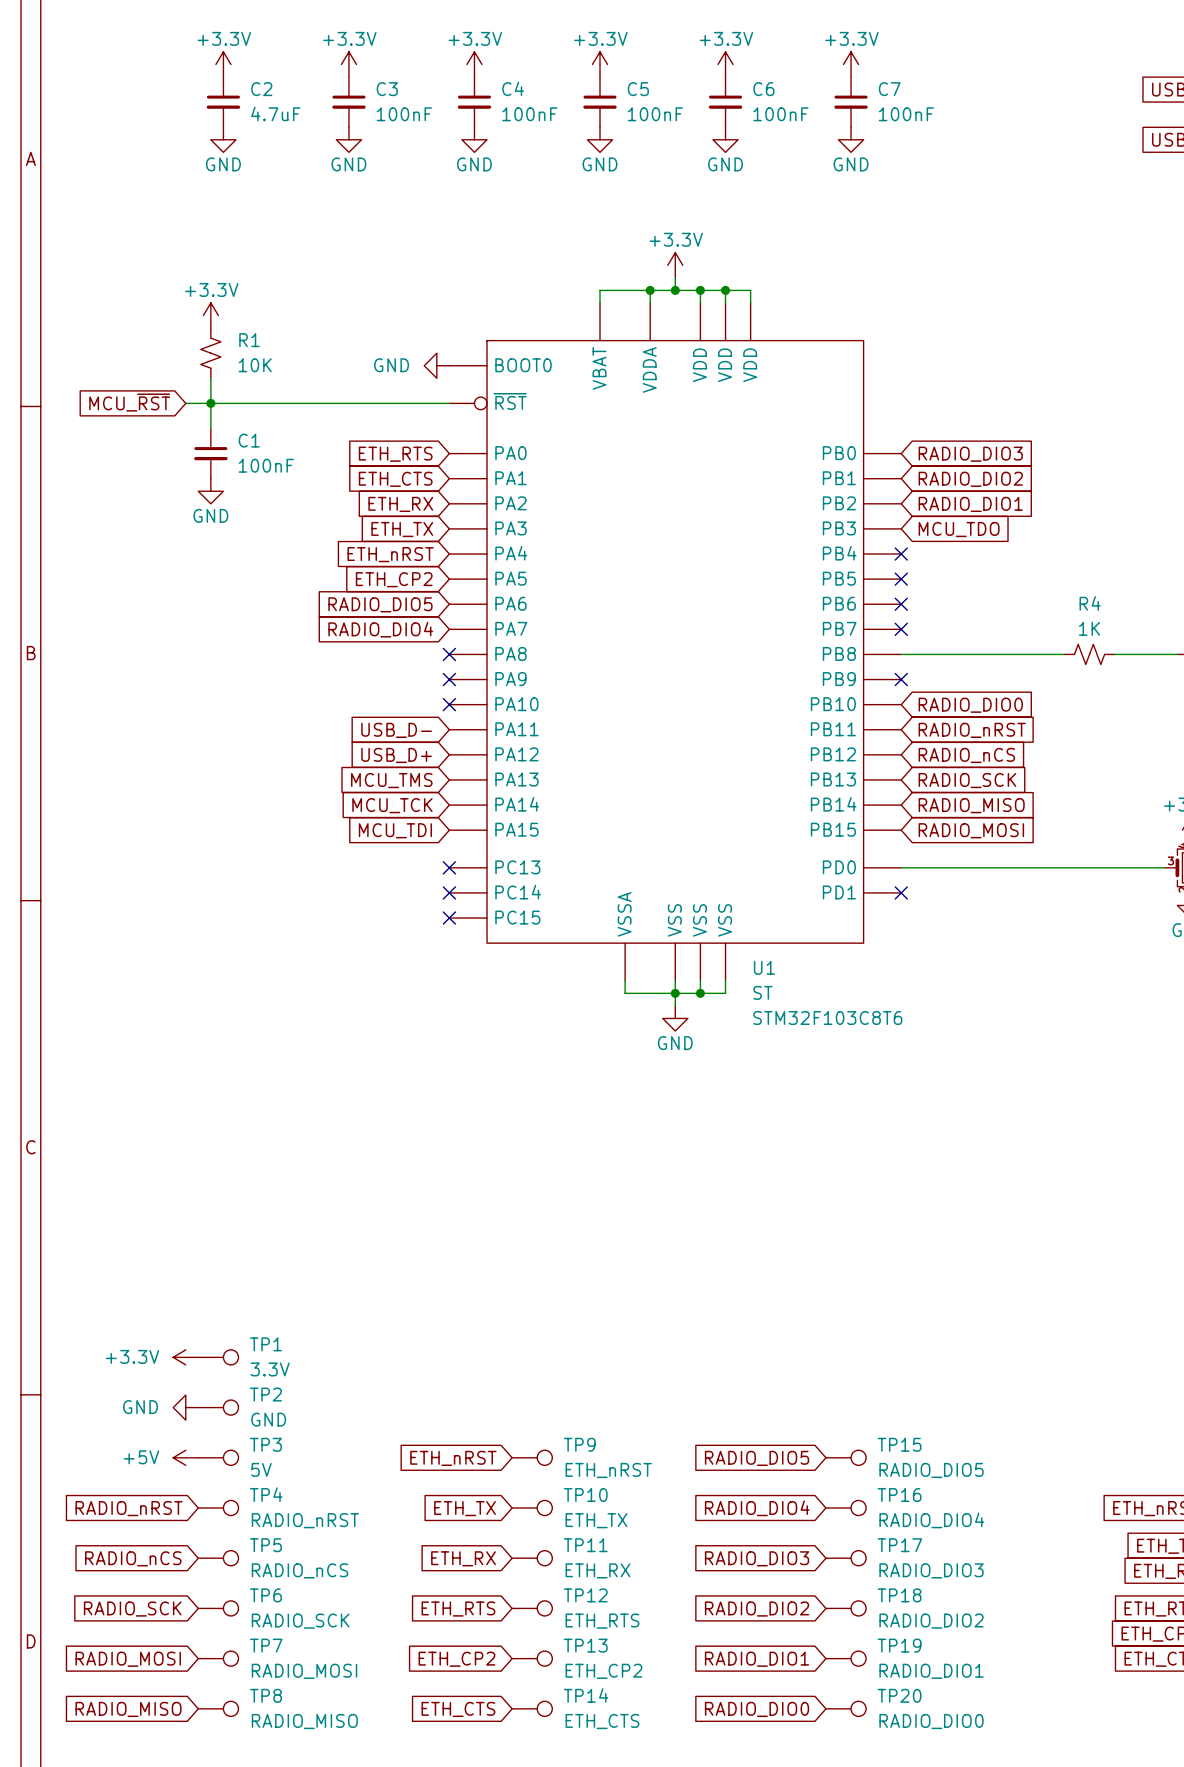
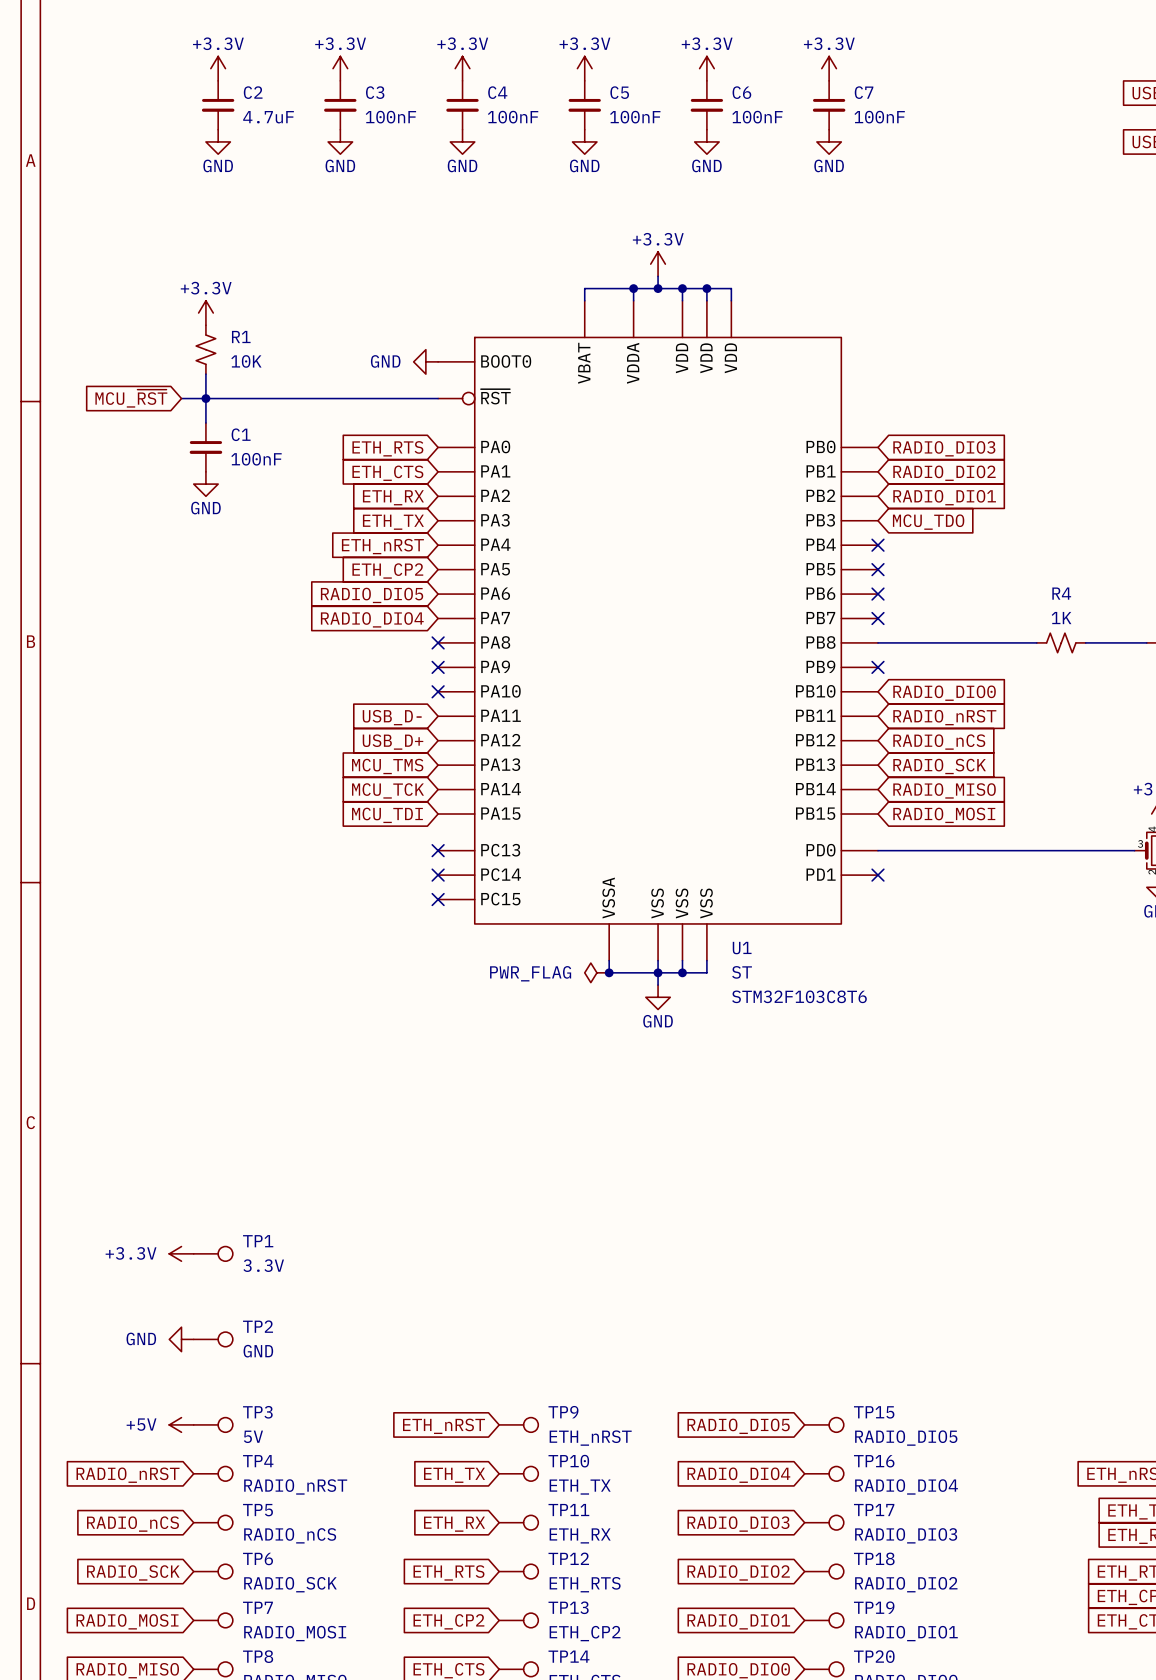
power symbol: none -> PWR_FLAG (596, 972)
junction: none -> (609, 972)
power symbol position: +3.3V (185, 1357) -> +3.3V (181, 1253)
TP1 position: (218, 1357) -> (213, 1253)
power symbol position: GND (185, 1407) -> GND (181, 1339)
TP2 position: (218, 1407) -> (213, 1339)

